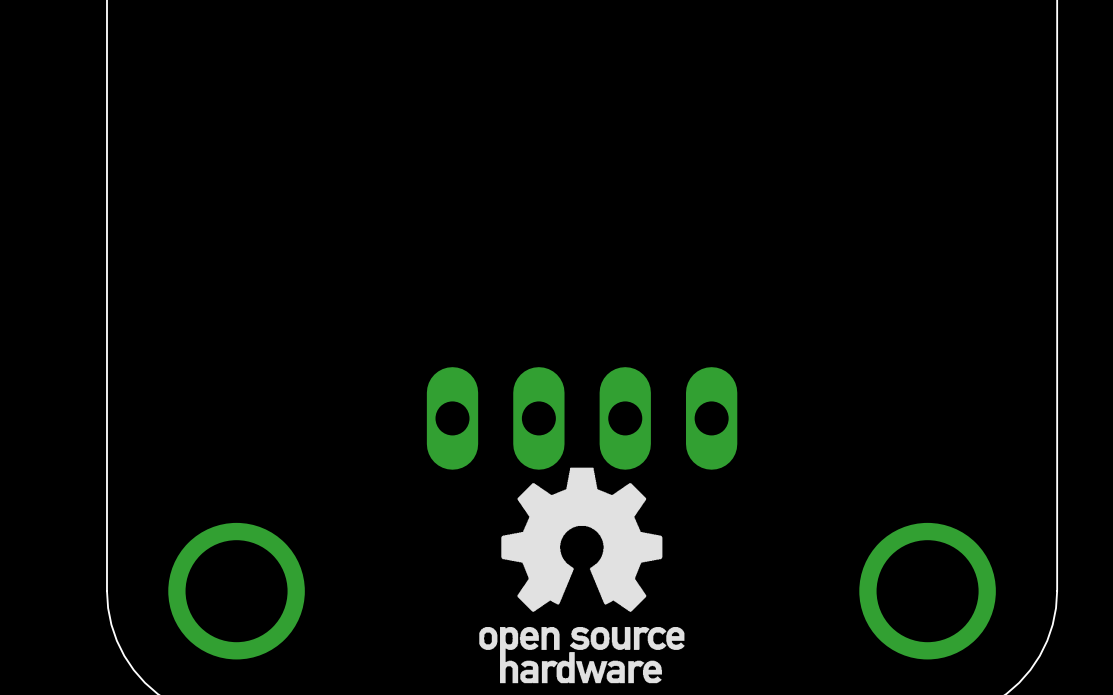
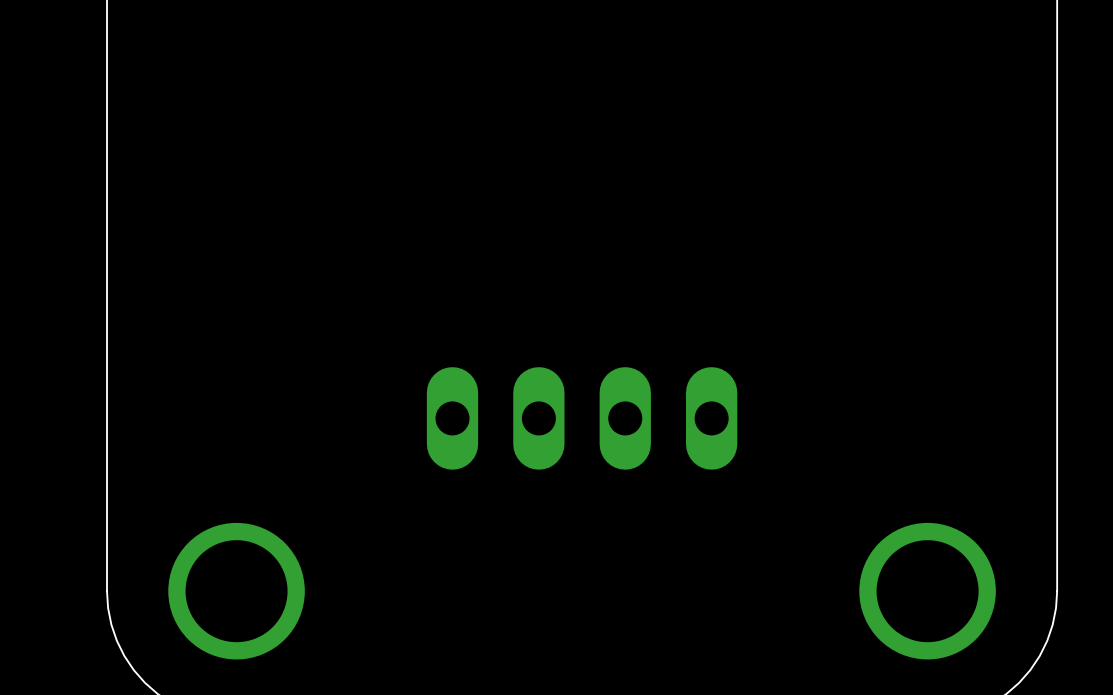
drawing: [479, 467, 685, 684] -> none

